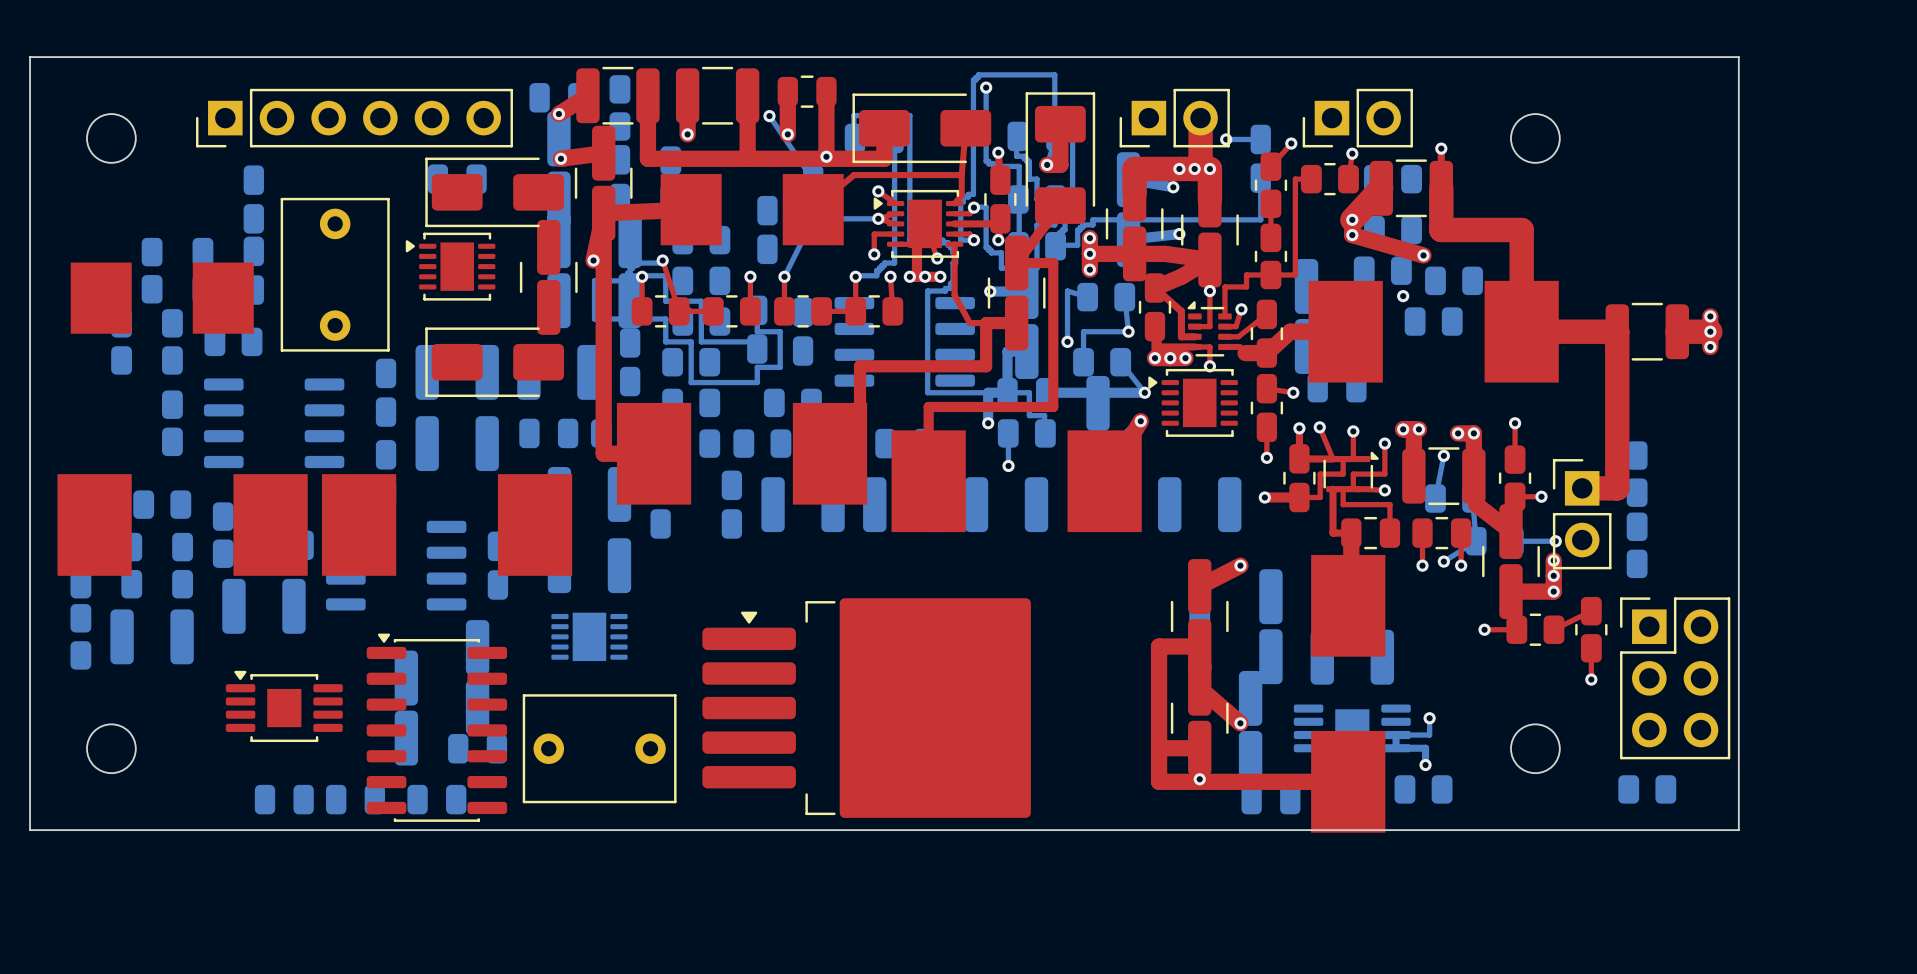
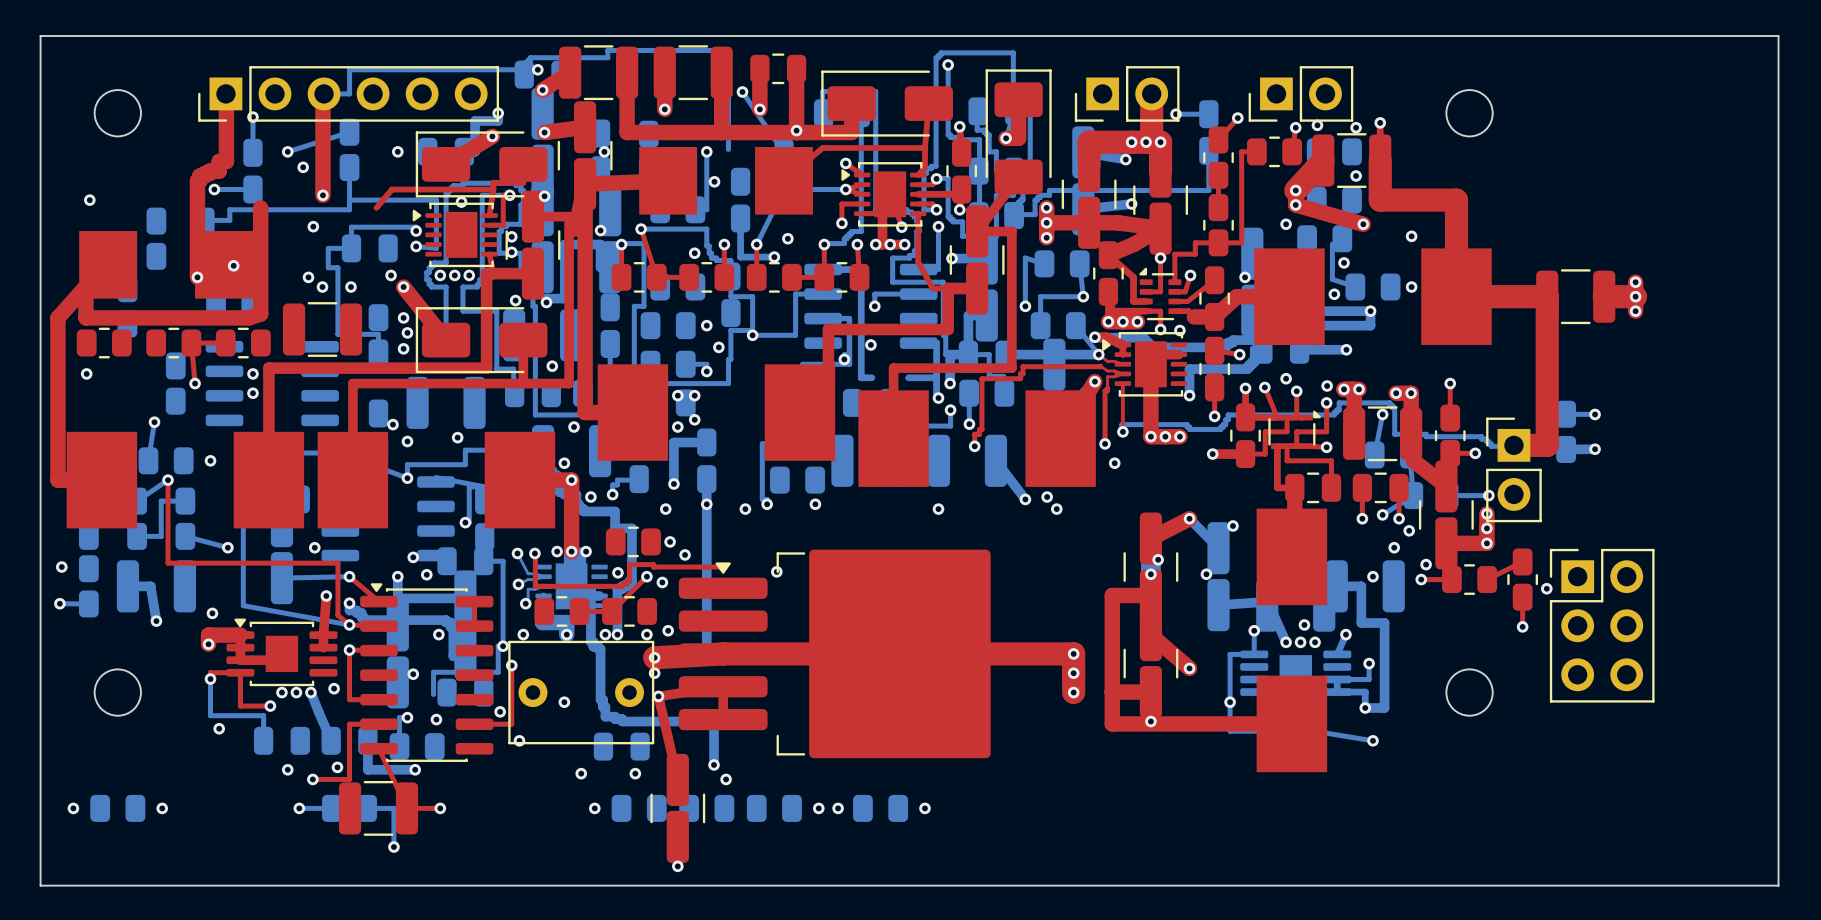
board edge: (1738, 57) (1738, 830) (30, 830) -> (1662, 35) (1778, 35) (1778, 885) (40, 885) (40, 769)
via: none -> (537, 69)
part: (619, 107) -> none
top track: none -> (225, 93) (226, 161) (219, 161) (219, 171) (209, 171) (209, 173) (199, 175) (199, 180) (197, 180) (197, 277)
bottom track: none -> (322, 93) (349, 93) (349, 69) (525, 69) (525, 62) (528, 62) (530, 57) (607, 57) (607, 50) (726, 50) (728, 149)
top track: none -> (324, 93) (322, 195)
bottom track: none -> (498, 113) (498, 120) (475, 120) (475, 151) (464, 151)
via: none -> (498, 113)
bottom track: none -> (252, 117) (252, 152)
via: none -> (252, 117)
via: none -> (1317, 125)
via: none -> (1356, 127)
bottom track: none -> (349, 132) (287, 151)
top track: none -> (492, 136) (446, 164)
via: none -> (492, 136)
part: none -> (349, 149)
via: none -> (287, 151)
via: none -> (397, 151)
via: none -> (604, 151)
bottom track: none -> (706, 151) (706, 209) (694, 209)
via: none -> (706, 151)
top track: none -> (523, 164) (523, 182) (493, 182) (493, 189)
via: none -> (303, 167)
bottom track: none -> (349, 167) (349, 209) (229, 209) (229, 220) (210, 220)
via: none -> (1356, 175)
via: none -> (714, 181)
bottom track: none -> (214, 189) (252, 189)
via: none -> (214, 189)
top track: none -> (493, 189) (392, 189) (376, 207)
top track: none -> (493, 189) (489, 215)
via: none -> (322, 195)
top track: none -> (509, 195) (503, 195) (503, 225) (489, 225)
bottom track: none -> (509, 195) (482, 195) (482, 279) (479, 279) (479, 284) (477, 284) (477, 287) (462, 287) (462, 311) (496, 311) (496, 369) (513, 369) (514, 393)
via: none -> (509, 195)
via: none -> (544, 196)
via: none -> (89, 200)
bottom track: none -> (349, 200) (436, 200) (436, 248) (416, 246)
via: none -> (461, 202)
top track: none -> (260, 207) (260, 314) (249, 317) (85, 317) (85, 286) (57, 317) (57, 480) (101, 480)
top track: none -> (534, 216) (569, 216) (569, 383) (352, 383) (352, 480)
bottom track: none -> (740, 218) (740, 257) (774, 257)
via: none -> (1286, 224)
via: none -> (313, 226)
bottom track: none -> (938, 226) (938, 269) (918, 269)
via: none -> (938, 226)
via: (593, 260) -> none
bottom track: (663, 260) (663, 263) (635, 263) (635, 265) (630, 268) (630, 273) (627, 273) (627, 280) (594, 280) (594, 319) (665, 319) -> (644, 267) (644, 284)
bottom track: none -> (641, 229) (706, 229) (706, 245) (709, 245) (711, 258) (716, 258) (716, 260) (730, 260) (730, 276)
bottom track: none -> (416, 231) (416, 227) (351, 227) (351, 248) (328, 248) (328, 267) (337, 267) (337, 334) (378, 334) (378, 352)
via: none -> (416, 231)
via: none -> (600, 230)
part position: (450, 266) -> (455, 234)
via: none -> (511, 236)
via: none -> (1411, 236)
part: (253, 270) -> none
via: none -> (787, 238)
bottom track: none -> (1342, 238) (1332, 244) (1332, 279) (1355, 287)
part: (335, 274) -> none
via: none -> (416, 246)
part: none -> (369, 248)
part: (701, 280) -> none
part: (1454, 280) -> none
via: none -> (511, 252)
via: none -> (694, 253)
top track: none -> (489, 254) (493, 273) (534, 273) (486, 273) (486, 368) (268, 368) (268, 480)
via: none -> (774, 257)
via: none -> (233, 265)
bottom track: none -> (610, 267) (600, 267) (600, 244) (564, 244) (564, 298) (546, 298) (546, 302)
bottom track: (665, 301) (701, 301) (701, 341) (757, 341) (757, 349) -> none
bottom track: none -> (823, 269) (861, 269) (861, 377) (871, 377)
via: none -> (391, 275)
via: none -> (440, 275)
via: none -> (454, 275)
via: none -> (469, 275)
via: none -> (197, 277)
via: none -> (308, 277)
via: none -> (1245, 277)
bottom track: (927, 316) (927, 392) (983, 392) -> (892, 282) (943, 282) (943, 335) (945, 335) (945, 354)
via: none -> (322, 287)
via: none -> (350, 287)
top track: none -> (403, 287) (446, 340)
via: none -> (403, 287)
via: none -> (1411, 287)
bottom track: none -> (823, 294) (795, 294) (795, 335) (752, 335)
bottom track: none -> (918, 294) (874, 294) (874, 306)
via: none -> (1334, 294)
part: (803, 331) -> none
via: none -> (515, 300)
via: none -> (546, 302)
part: (172, 341) -> none
bottom track: (665, 341) (691, 341) (691, 382) (757, 382) -> (644, 306) (634, 306) (634, 383) (728, 383) (728, 359) (730, 359) (730, 344)
via: none -> (874, 306)
bottom track: none -> (1252, 310) (1370, 311) (1370, 325) (1281, 325) (1281, 340) (1232, 340) (1232, 342) (1228, 342) (1225, 347) (1150, 347) (1143, 337) (1094, 337)
via: none -> (1370, 311)
via: none -> (403, 317)
part footprint: [375, 358, 397, 427] -> [368, 304, 389, 367]
part position: (494, 362) -> (481, 340)
via: none -> (706, 325)
part: none -> (322, 329)
via: none -> (1179, 330)
via: none -> (407, 332)
part: (457, 372) -> none
via: none -> (752, 335)
top track: none -> (1094, 337) (1106, 337) (1122, 344) (1122, 354)
via: none -> (1094, 337)
top track: none -> (523, 340) (523, 383)
part: none -> (104, 343)
part: none -> (173, 343)
top track: none -> (225, 343) (191, 343) (195, 383)
part: none -> (243, 343)
bottom track: none -> (918, 343) (936, 343) (936, 398) (938, 398)
bottom track: none -> (610, 343) (610, 414) (535, 414) (535, 306) (532, 306) (532, 272) (520, 272) (520, 253) (499, 253) (499, 231) (501, 231) (501, 226) (506, 226) (506, 224) (520, 224) (523, 190) (520, 190) (520, 185) (516, 185) (516, 183) (462, 183) (462, 185) (453, 185) (453, 188) (446, 192) (446, 262) (434, 262) (434, 265) (429, 267) (429, 272) (426, 272) (426, 279) (429, 279) (429, 284) (431, 284) (431, 287) (446, 287) (446, 332) (462, 332) (463, 350)
via: none -> (870, 344)
via: none -> (718, 347)
via: none -> (403, 348)
bottom track: none -> (1262, 349) (1254, 349) (1254, 361) (1252, 361) (1247, 369) (1189, 369) (1189, 395)
bottom track: none -> (1299, 349) (1346, 349)
via: none -> (1346, 349)
top track: none -> (1098, 354) (1107, 361) (1122, 364)
top track: none -> (1178, 354) (1150, 354) (1150, 436) (1179, 436)
bottom track: none -> (844, 359) (844, 354) (849, 354) (849, 318) (822, 318) (823, 318) (849, 318) (849, 364) (802, 364) (802, 393)
via: none -> (844, 359)
bottom track: none -> (685, 364) (706, 364) (706, 371)
part: (792, 402) -> none
via: none -> (552, 366)
via: none -> (706, 371)
via: none -> (86, 373)
via: none -> (252, 373)
bottom track: none -> (908, 377) (936, 377)
via: none -> (1286, 378)
via: none -> (195, 383)
top track: none -> (1122, 383) (1122, 431)
via: none -> (1327, 385)
top track: none -> (1107, 388) (1107, 390) (1105, 390) (1105, 443)
top track: none -> (1107, 389) (1107, 376) (1122, 373) (1107, 371) (1100, 366) (1022, 366) (1020, 378) (981, 378) (981, 429) (979, 429) (979, 434) (974, 434) (974, 446)
via: none -> (252, 393)
via: none -> (677, 395)
via: none -> (694, 395)
via: none -> (1189, 395)
via: none -> (938, 398)
part: (762, 443) -> none
bottom track: none -> (950, 410) (950, 426) (905, 426) (905, 435)
via: none -> (950, 410)
bottom track: none -> (1566, 414) (1595, 414)
via: none -> (1595, 414)
via: none -> (694, 419)
bottom track: none -> (154, 422) (148, 460)
via: none -> (154, 422)
via: none -> (392, 424)
via: none -> (574, 427)
via: none -> (677, 427)
bottom track: none -> (1122, 431) (1121, 424) (1187, 424) (1189, 429) (1220, 429) (1220, 427) (1225, 424) (1228, 414) (1334, 414) (1334, 412) (1339, 410) (1339, 402) (1389, 402) (1389, 405) (1394, 407) (1394, 434) (1426, 434) (1426, 436) (1481, 436) (1481, 439) (1486, 439) (1491, 446) (1513, 445)
via: none -> (1122, 431)
via: none -> (1150, 436)
via: none -> (1165, 436)
via: none -> (1179, 436)
via: none -> (457, 437)
via: none -> (407, 441)
bottom track: none -> (706, 442) (673, 442) (673, 483)
bottom track: none -> (778, 443) (762, 443) (762, 499) (767, 499) (767, 504)
via: none -> (1105, 443)
via: none -> (974, 446)
bottom track: none -> (1595, 449) (1566, 449)
via: none -> (1595, 449)
bottom track: none -> (484, 450) (465, 450) (465, 464) (407, 464) (407, 478) (340, 453) (300, 453) (300, 482)
bottom track: none -> (542, 451) (549, 451) (549, 470) (552, 470) (552, 475) (557, 475) (557, 487) (559, 487) (559, 492) (564, 492) (564, 494) (576, 494) (576, 504) (578, 504) (578, 509) (583, 509) (583, 511) (615, 511) (615, 528) (631, 528) (631, 581) (629, 581) (627, 586) (617, 588) (617, 634)
via: none -> (210, 460)
part: (803, 504) -> none
bottom track: none -> (995, 460) (1025, 499)
part position: (1199, 504) -> (1365, 586)
via: none -> (564, 463)
via: none -> (1114, 463)
via: none -> (407, 478)
bottom track: none -> (435, 477) (484, 486) (469, 486) (469, 522) (465, 522)
bottom track: none -> (639, 479) (617, 480) (617, 484) (612, 484) (612, 494)
bottom track: none -> (706, 479) (706, 657) (654, 657)
top track: none -> (168, 480) (168, 563) (337, 563) (337, 615) (349, 624) (378, 626)
bottom track: none -> (168, 480) (137, 501)
via: none -> (168, 480)
top track: none -> (519, 480) (571, 480) (571, 551)
via: none -> (571, 480)
part: none -> (797, 480)
via: none -> (673, 483)
part: (223, 535) -> none
via: none -> (612, 494)
via: none -> (590, 497)
via: none -> (1047, 497)
via: none -> (1025, 499)
part: (1637, 545) -> none
bottom track: none -> (185, 501) (161, 501) (161, 536) (137, 536)
via: none -> (706, 504)
via: none -> (767, 504)
via: none -> (815, 504)
via: none -> (665, 509)
via: none -> (745, 509)
via: none -> (938, 509)
via: none -> (1056, 509)
part: (589, 565) -> none
bottom track: none -> (1189, 518) (1218, 548)
bottom track: none -> (281, 521) (243, 521) (243, 605) (349, 624)
via: none -> (465, 522)
via: none -> (1232, 525)
via: none -> (1409, 530)
bottom track: none -> (185, 536) (227, 547)
part: none -> (633, 541)
via: none -> (670, 541)
via: none -> (227, 547)
via: none -> (314, 547)
via: none -> (1394, 547)
part: none -> (281, 549)
via: none -> (557, 551)
via: none -> (571, 551)
via: none -> (586, 551)
bottom track: none -> (517, 553) (528, 573) (543, 576) (528, 579) (518, 584)
via: none -> (517, 553)
top track: none -> (534, 553) (535, 586) (622, 586) (622, 583) (627, 583) (627, 581) (629, 581) (629, 564) (653, 564) (653, 567) (721, 567)
via: none -> (534, 553)
via: none -> (685, 554)
part: (263, 606) -> none
via: none -> (413, 557)
via: none -> (1158, 559)
part: none -> (465, 561)
bottom track: none -> (483, 561) (503, 561) (503, 646) (498, 646) (498, 672) (433, 672) (433, 694)
via: none -> (1426, 564)
via: none -> (61, 567)
via: none -> (776, 571)
via: none -> (617, 572)
via: none -> (426, 574)
via: none -> (1150, 574)
via: none -> (1206, 574)
top track: none -> (349, 576) (378, 601)
bottom track: none -> (349, 576) (281, 578)
via: none -> (349, 576)
bottom track: none -> (397, 576) (397, 598) (465, 598)
via: none -> (397, 576)
top track: none -> (646, 576) (611, 611) (579, 611)
via: none -> (646, 576)
via: none -> (1372, 576)
via: none -> (662, 582)
via: none -> (518, 584)
bottom track: none -> (127, 586) (150, 586) (156, 621)
bottom track: none -> (543, 586) (528, 589) (528, 603) (525, 603)
bottom track: none -> (1336, 586) (1361, 586) (1361, 623) (1384, 623) (1384, 707) (1365, 707)
via: none -> (1546, 588)
top track: none -> (326, 595) (323, 647)
via: none -> (326, 595)
bottom track: none -> (543, 595) (542, 622) (566, 622) (566, 634)
bottom track: none -> (599, 595) (571, 595) (571, 586) (571, 551) (581, 552) (581, 588) (590, 588) (590, 641) (593, 641) (593, 646) (598, 646) (598, 649) (600, 649) (600, 699) (602, 699) (602, 707) (605, 707) (605, 716) (615, 716) (615, 719) (622, 719) (622, 721) (714, 721) (714, 764)
top track: none -> (474, 601) (474, 626)
bottom track: none -> (349, 603) (349, 610) (361, 612) (361, 617) (364, 617) (364, 620) (446, 620) (446, 622) (450, 622) (450, 627) (453, 627) (453, 656) (465, 655)
via: none -> (349, 603)
bottom track: none -> (59, 603) (88, 603)
via: none -> (59, 603)
via: none -> (525, 603)
bottom track: none -> (1218, 605) (1267, 601) (1286, 642)
part: none -> (561, 611)
part: none -> (629, 611)
via: none -> (212, 613)
via: none -> (156, 621)
via: none -> (349, 624)
via: none -> (1304, 624)
via: none -> (668, 630)
bottom track: none -> (1254, 630) (1254, 654) (1230, 654) (1230, 731) (1277, 731)
via: none -> (1254, 630)
via: none -> (438, 634)
via: none -> (523, 634)
via: none -> (566, 634)
via: none -> (605, 634)
via: none -> (617, 634)
via: none -> (646, 634)
bottom track: none -> (1345, 634) (1337, 654)
via: none -> (1345, 634)
via: none -> (1286, 642)
via: none -> (1300, 642)
via: none -> (1315, 642)
top track: none -> (208, 644) (208, 635) (240, 635) (240, 660) (281, 660)
via: none -> (208, 644)
via: none -> (503, 646)
via: none -> (349, 650)
top track: none -> (378, 650) (349, 650) (349, 699) (378, 699)
via: none -> (1073, 653)
via: none -> (654, 657)
top track: none -> (511, 665) (511, 724) (474, 724)
via: none -> (511, 665)
top track: none -> (654, 673) (654, 657) (723, 653) (1073, 653) (1073, 692)
via: none -> (654, 673)
via: none -> (1073, 673)
part: (1250, 728) -> none
via: none -> (413, 674)
top track: none -> (210, 679) (210, 672) (240, 672) (240, 706) (270, 706)
bottom track: none -> (210, 679) (210, 715) (263, 715) (263, 740)
via: none -> (210, 679)
via: none -> (334, 688)
via: none -> (281, 692)
via: none -> (296, 692)
bottom track: none -> (310, 692) (331, 740)
via: none -> (310, 692)
via: none -> (1073, 692)
via: none -> (658, 696)
via: none -> (564, 702)
via: none -> (1230, 702)
via: none -> (270, 706)
via: none -> (500, 711)
bottom track: none -> (407, 717) (399, 717) (399, 746)
via: none -> (407, 717)
via: none -> (436, 719)
top track: none -> (723, 719) (723, 686) (658, 696) (677, 779)
top track: none -> (378, 724) (349, 724) (349, 779) (312, 779)
part footprint: [407, 784, 467, 815] -> [389, 733, 445, 761]
via: none -> (219, 728)
bottom track: none -> (1314, 731) (1372, 740)
part: (1423, 789) -> none
part: (1647, 789) -> none
bottom track: none -> (367, 740) (367, 769) (415, 769)
via: none -> (519, 740)
part: (1270, 799) -> none
via: none -> (1372, 740)
part: none -> (621, 746)
top track: none -> (378, 748) (406, 808) (440, 808)
via: none -> (714, 764)
via: none -> (337, 767)
via: none -> (287, 769)
via: none -> (415, 769)
via: none -> (581, 773)
via: none -> (635, 773)
via: none -> (312, 779)
via: none -> (726, 779)
via: none -> (73, 808)
part: none -> (117, 808)
via: none -> (162, 808)
bottom track: none -> (299, 808) (331, 808)
via: none -> (299, 808)
part: none -> (349, 808)
bottom track: none -> (367, 808) (393, 808) (393, 847)
part: none -> (378, 808)
via: none -> (440, 808)
via: none -> (594, 808)
part: none -> (639, 808)
part: none -> (677, 808)
part: none -> (706, 808)
part: none -> (774, 808)
via: none -> (818, 808)
via: none -> (838, 808)
part: none -> (880, 808)
via: none -> (924, 808)
via: none -> (393, 847)
via: none -> (677, 866)

